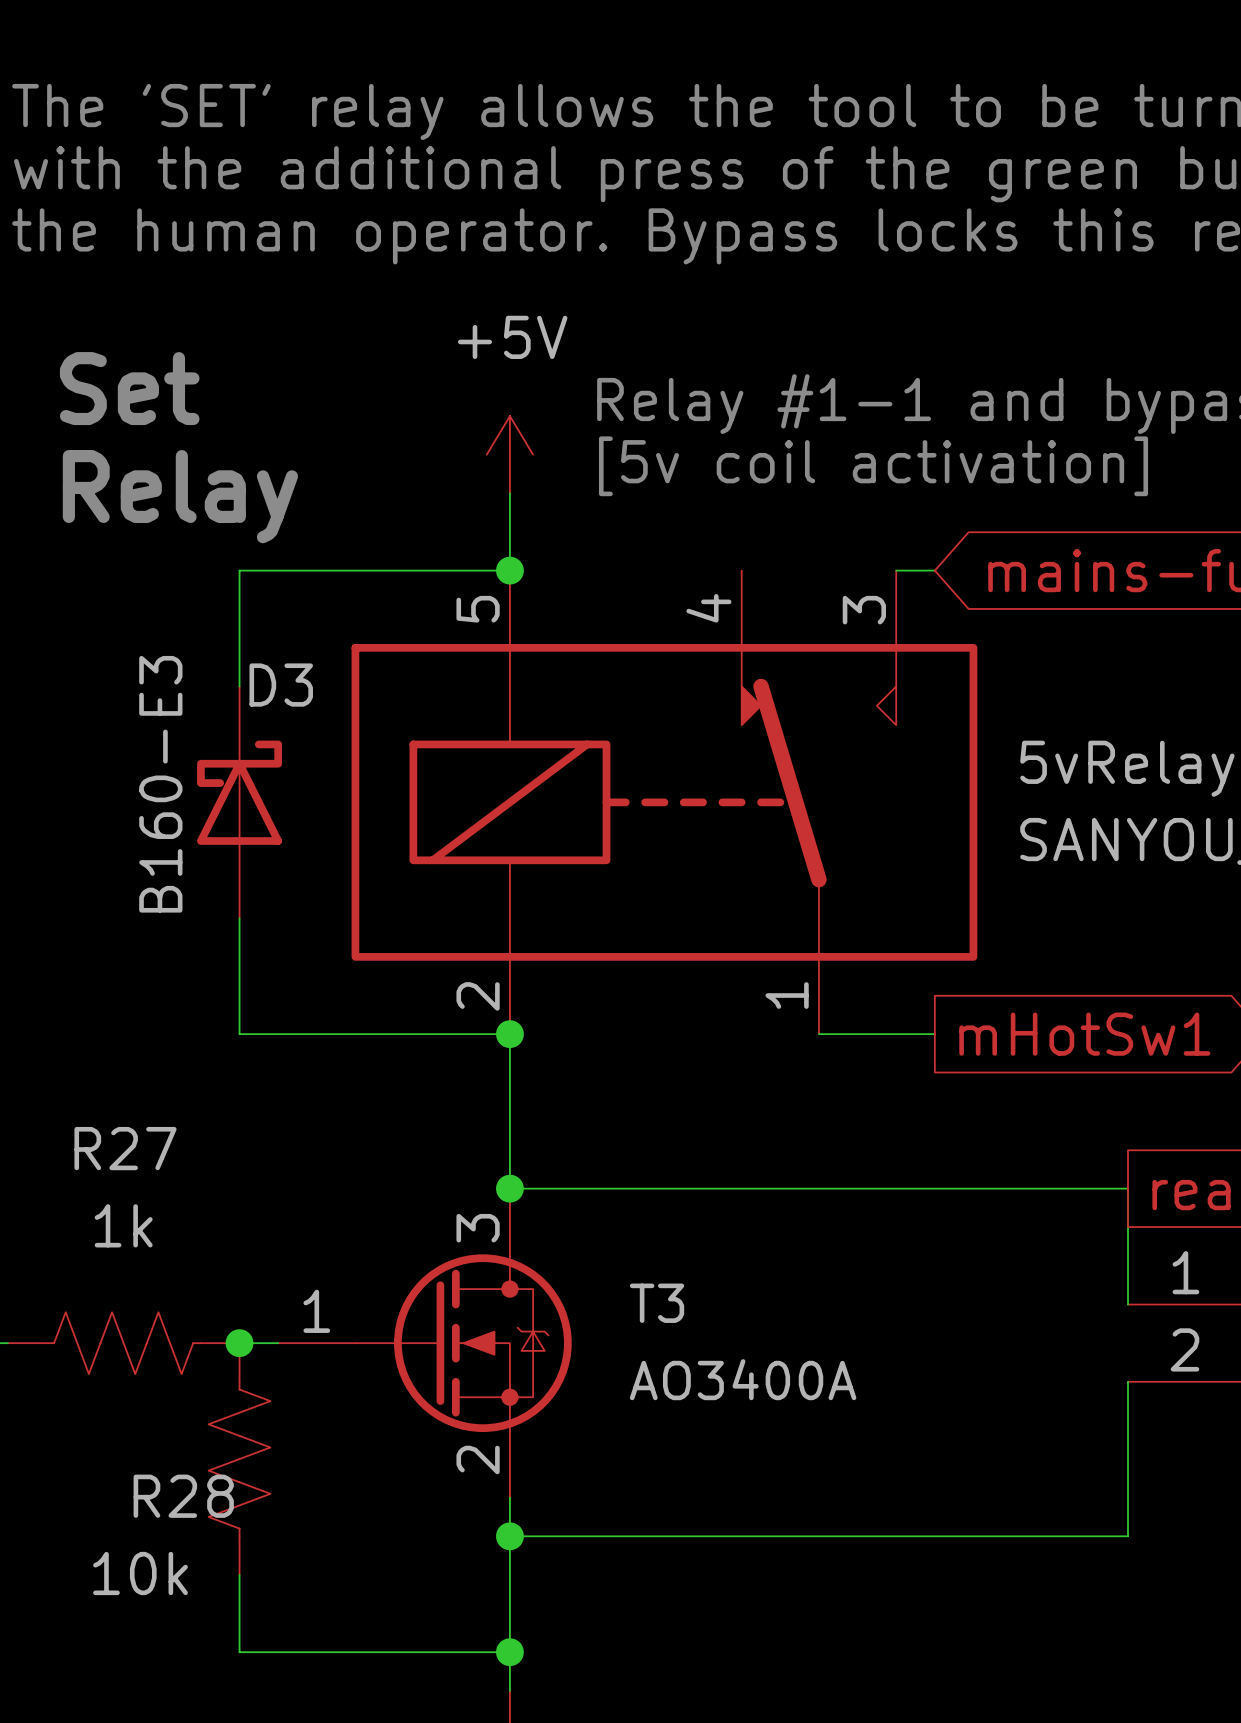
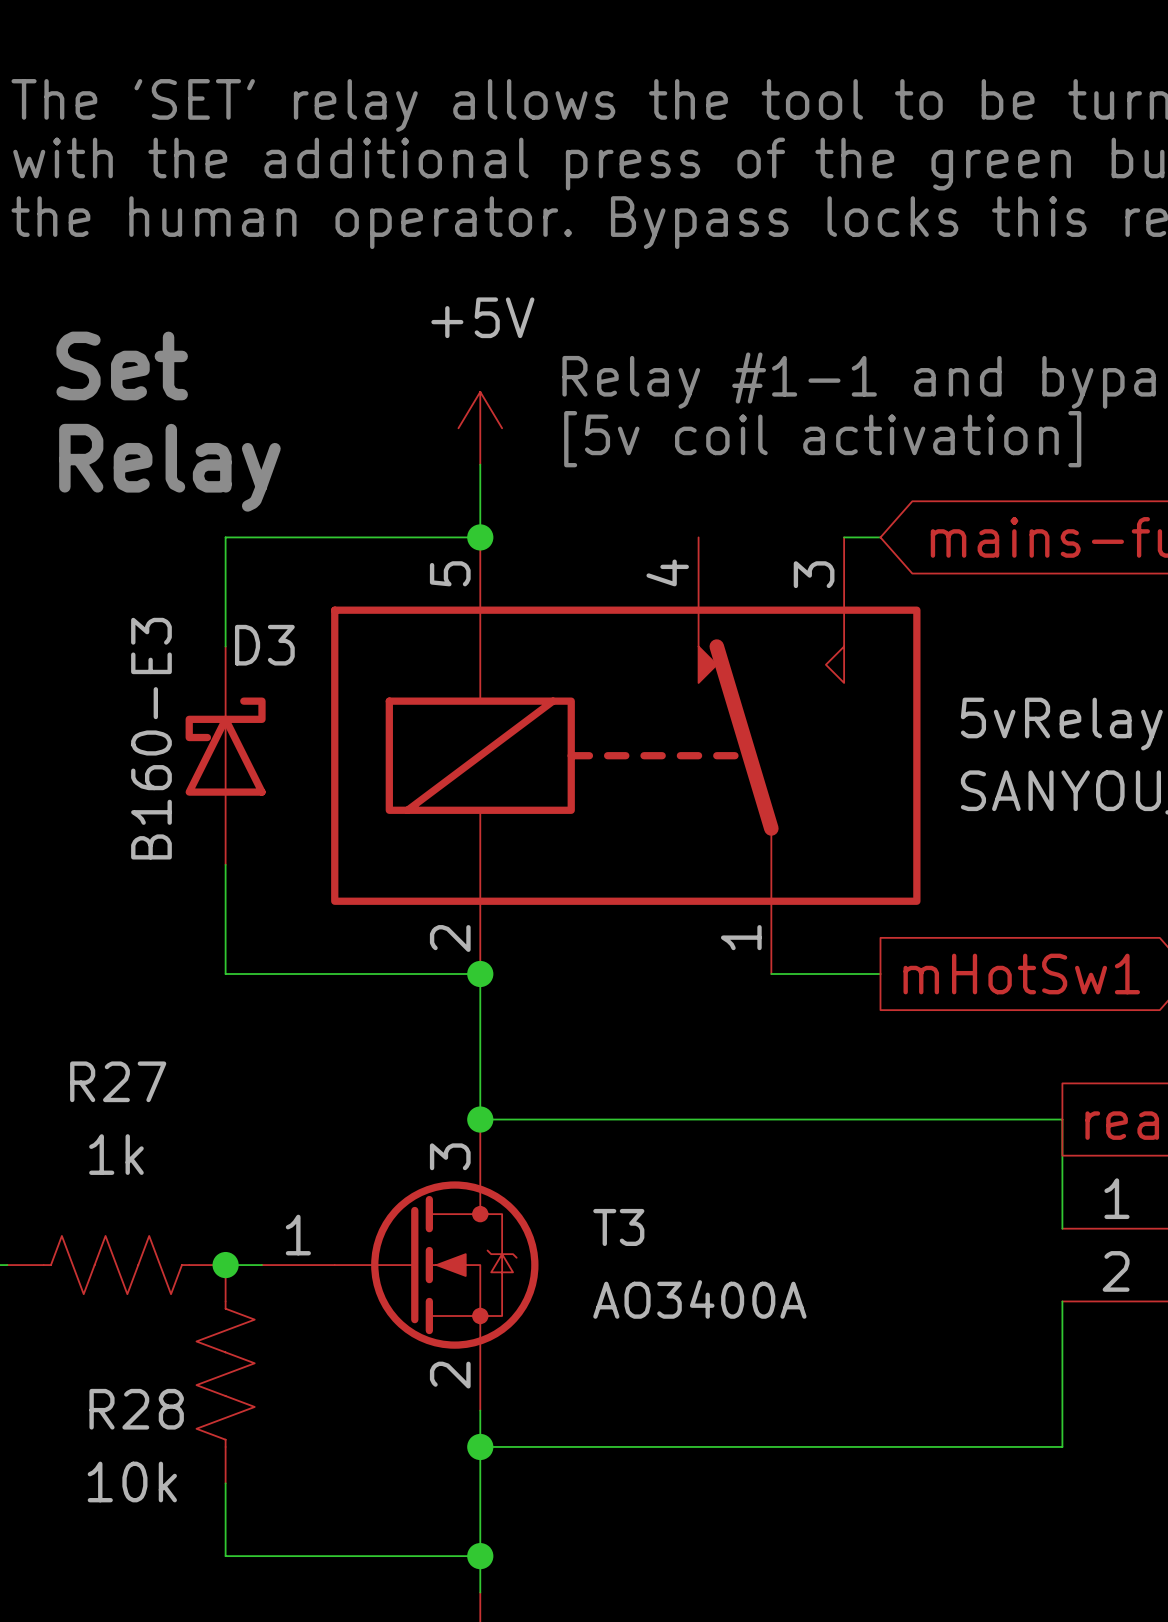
R28 name position: R28 (183, 1496) -> R28 (136, 1409)

